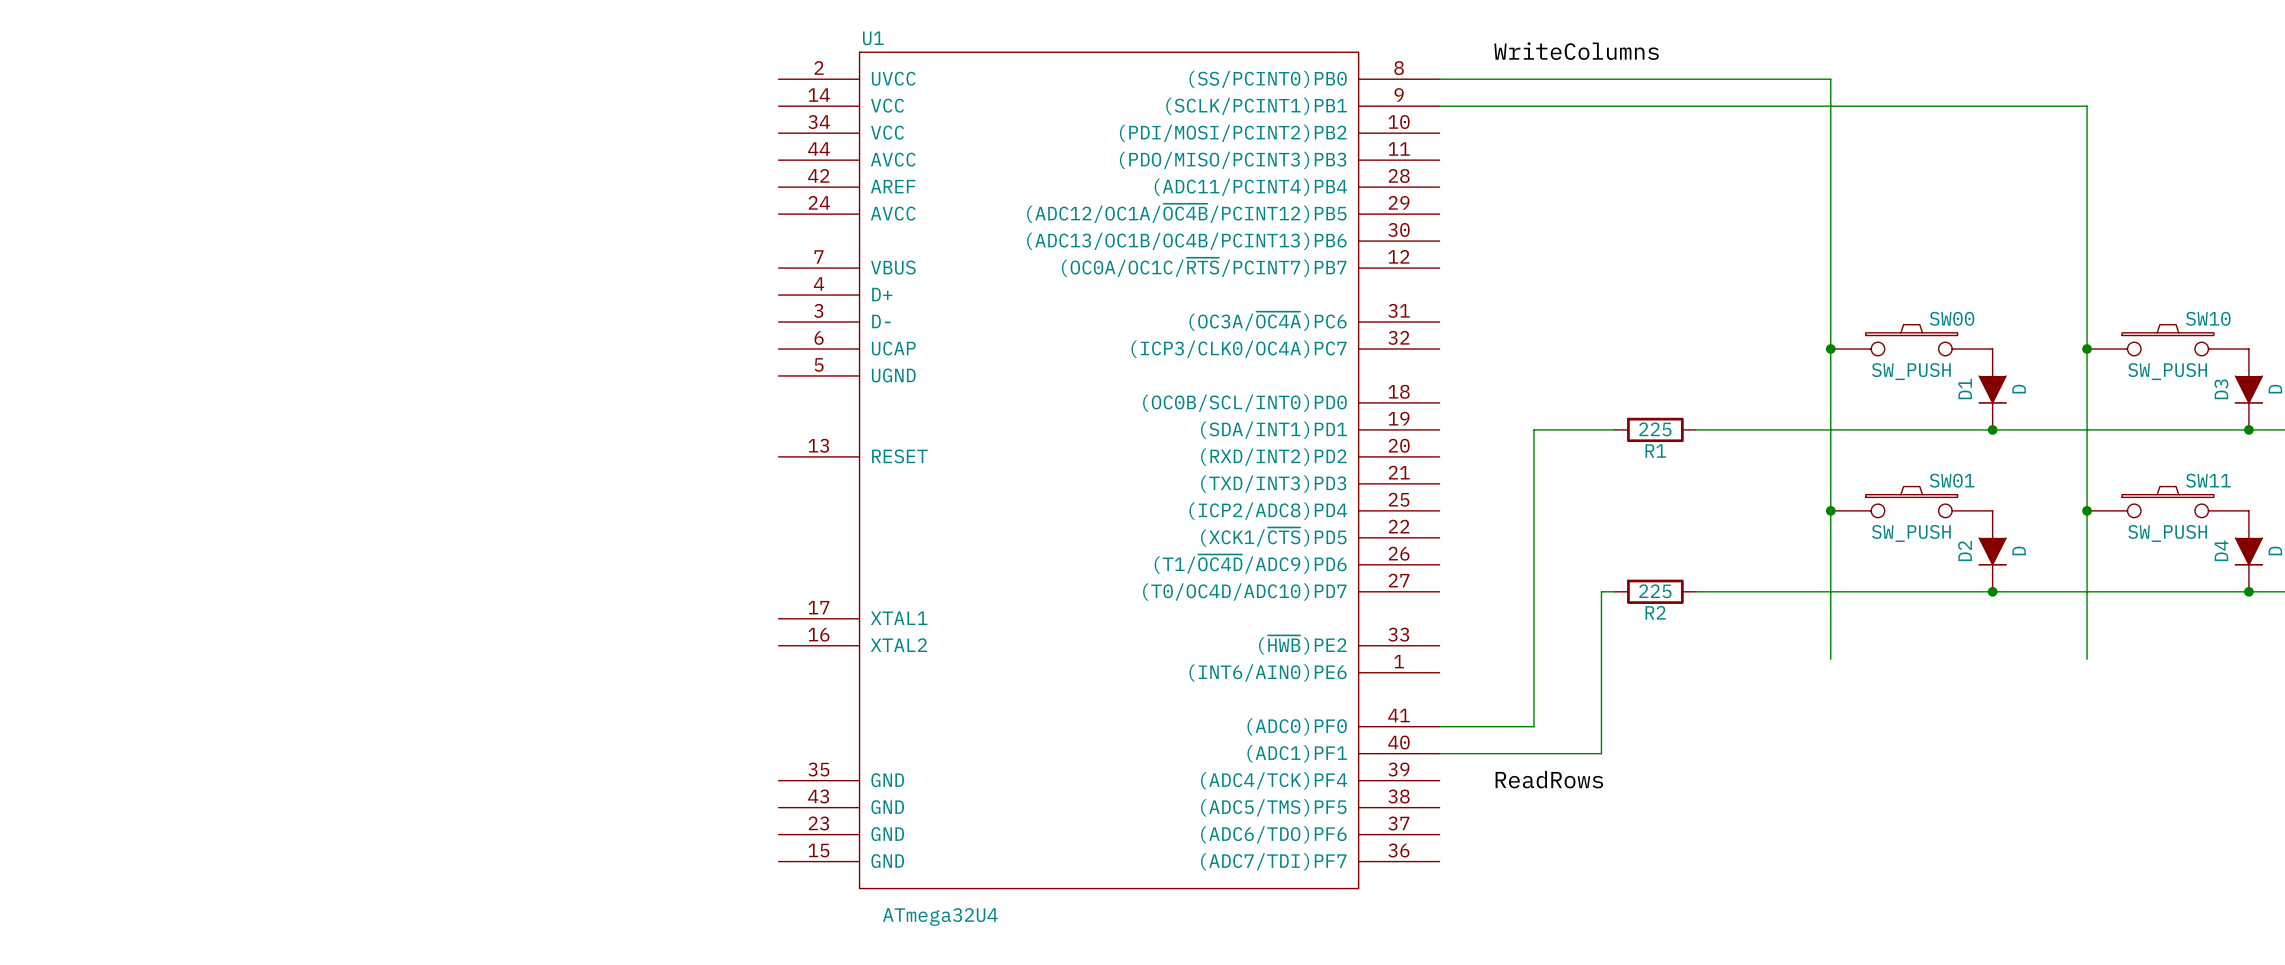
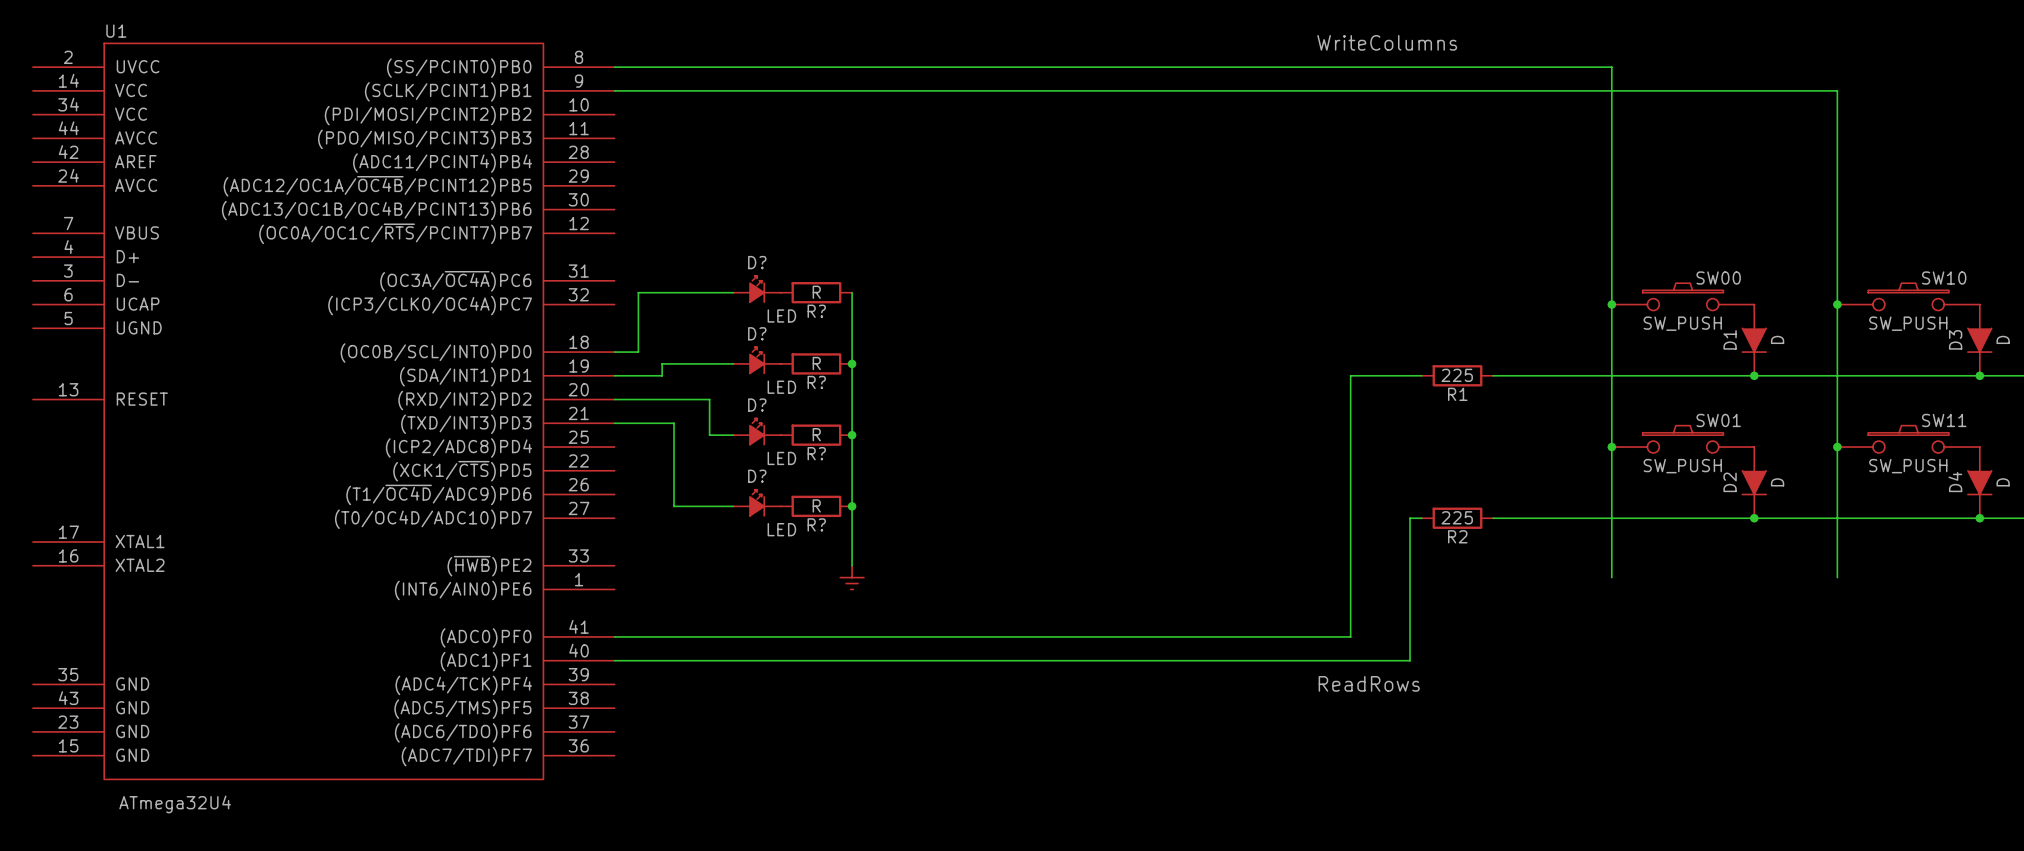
wire: none -> (614, 67) (1267, 67)
wire: none -> (614, 90) (1267, 90)
D?: none -> LED (757, 289)
wire: none -> (733, 292) (638, 292) (638, 352) (614, 352)
R?: none -> R (816, 292)
wire: none -> (852, 292) (852, 565)
D?: none -> LED (757, 360)
wire: none -> (733, 363) (662, 363) (662, 375) (614, 375)
R?: none -> R (816, 363)
junction: none -> (852, 363)
wire: none -> (614, 399) (709, 399) (709, 435) (733, 435)
U1 position: (1109, 470) -> (323, 411)
wire: none -> (614, 423) (674, 423) (674, 506) (733, 506)
D?: none -> LED (757, 431)
R?: none -> R (816, 435)
junction: none -> (852, 435)
D?: none -> LED (757, 502)
R?: none -> R (816, 506)
junction: none -> (852, 506)
power symbol: none -> (852, 577)
wire: none -> (614, 636) (1267, 636)
wire: none -> (614, 660) (1267, 660)

